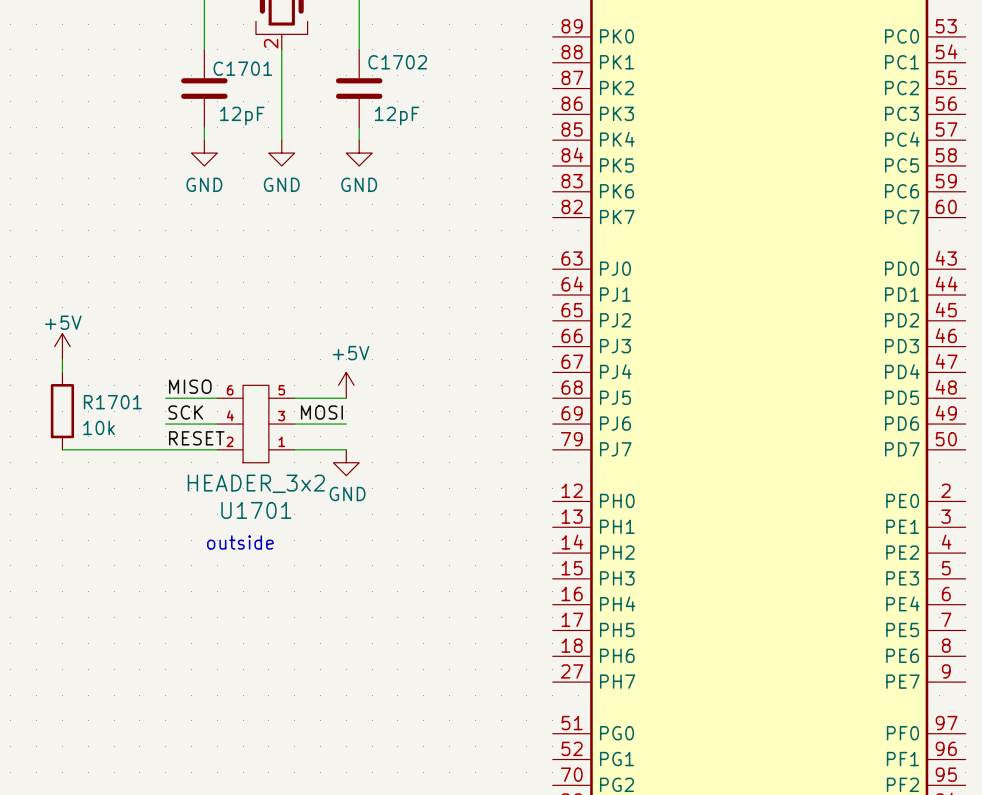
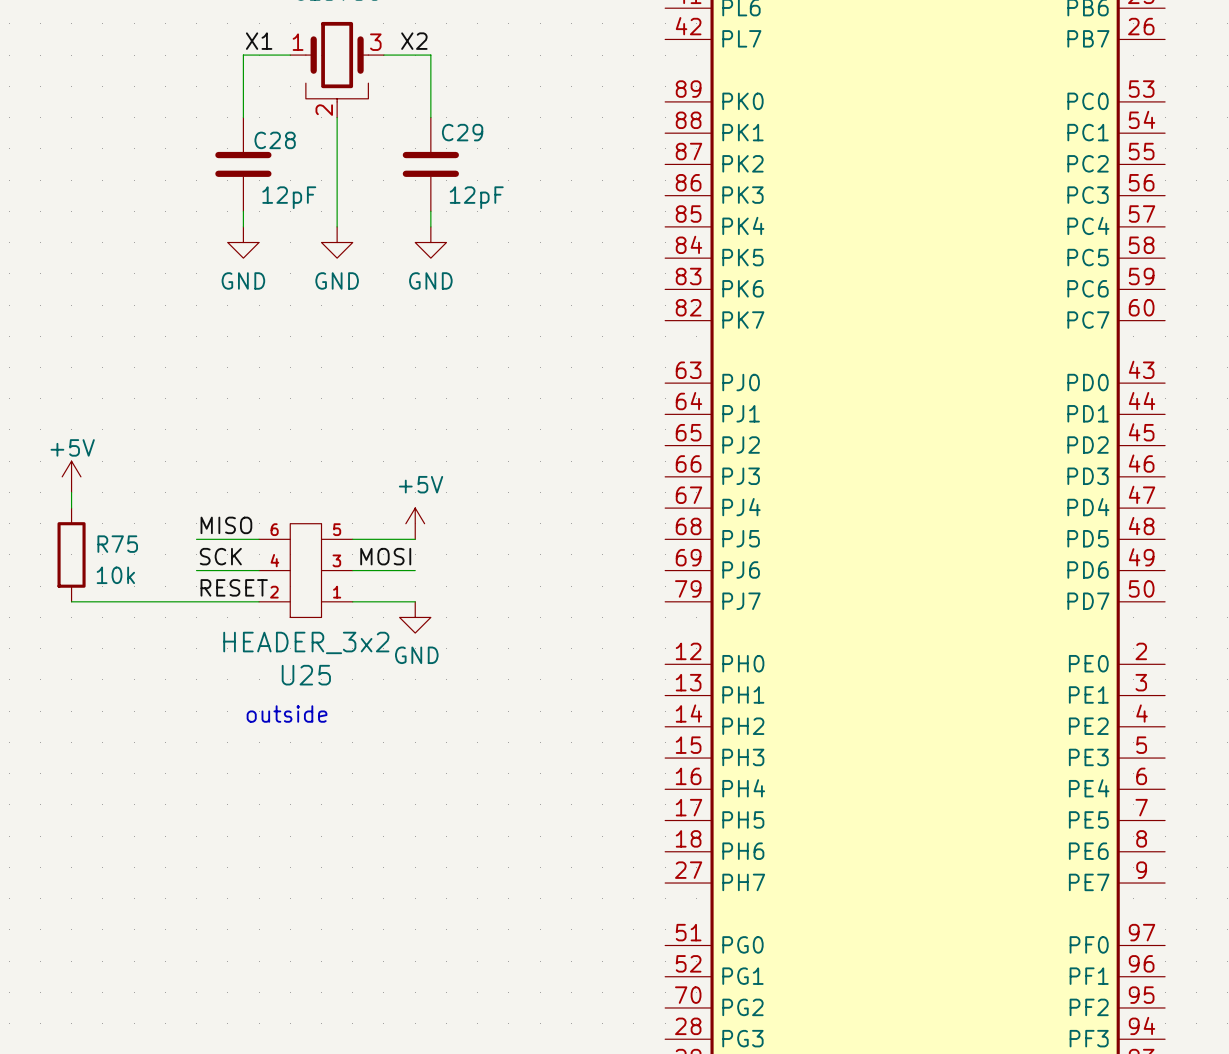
C1702 name: C1702 (397, 62) -> C29 (462, 132)
C1701 name: C1701 (242, 68) -> C28 (275, 140)
R1701 name: R1701 (112, 402) -> R75 (117, 544)
U1701 name: U1701 (256, 510) -> U25 (306, 675)

